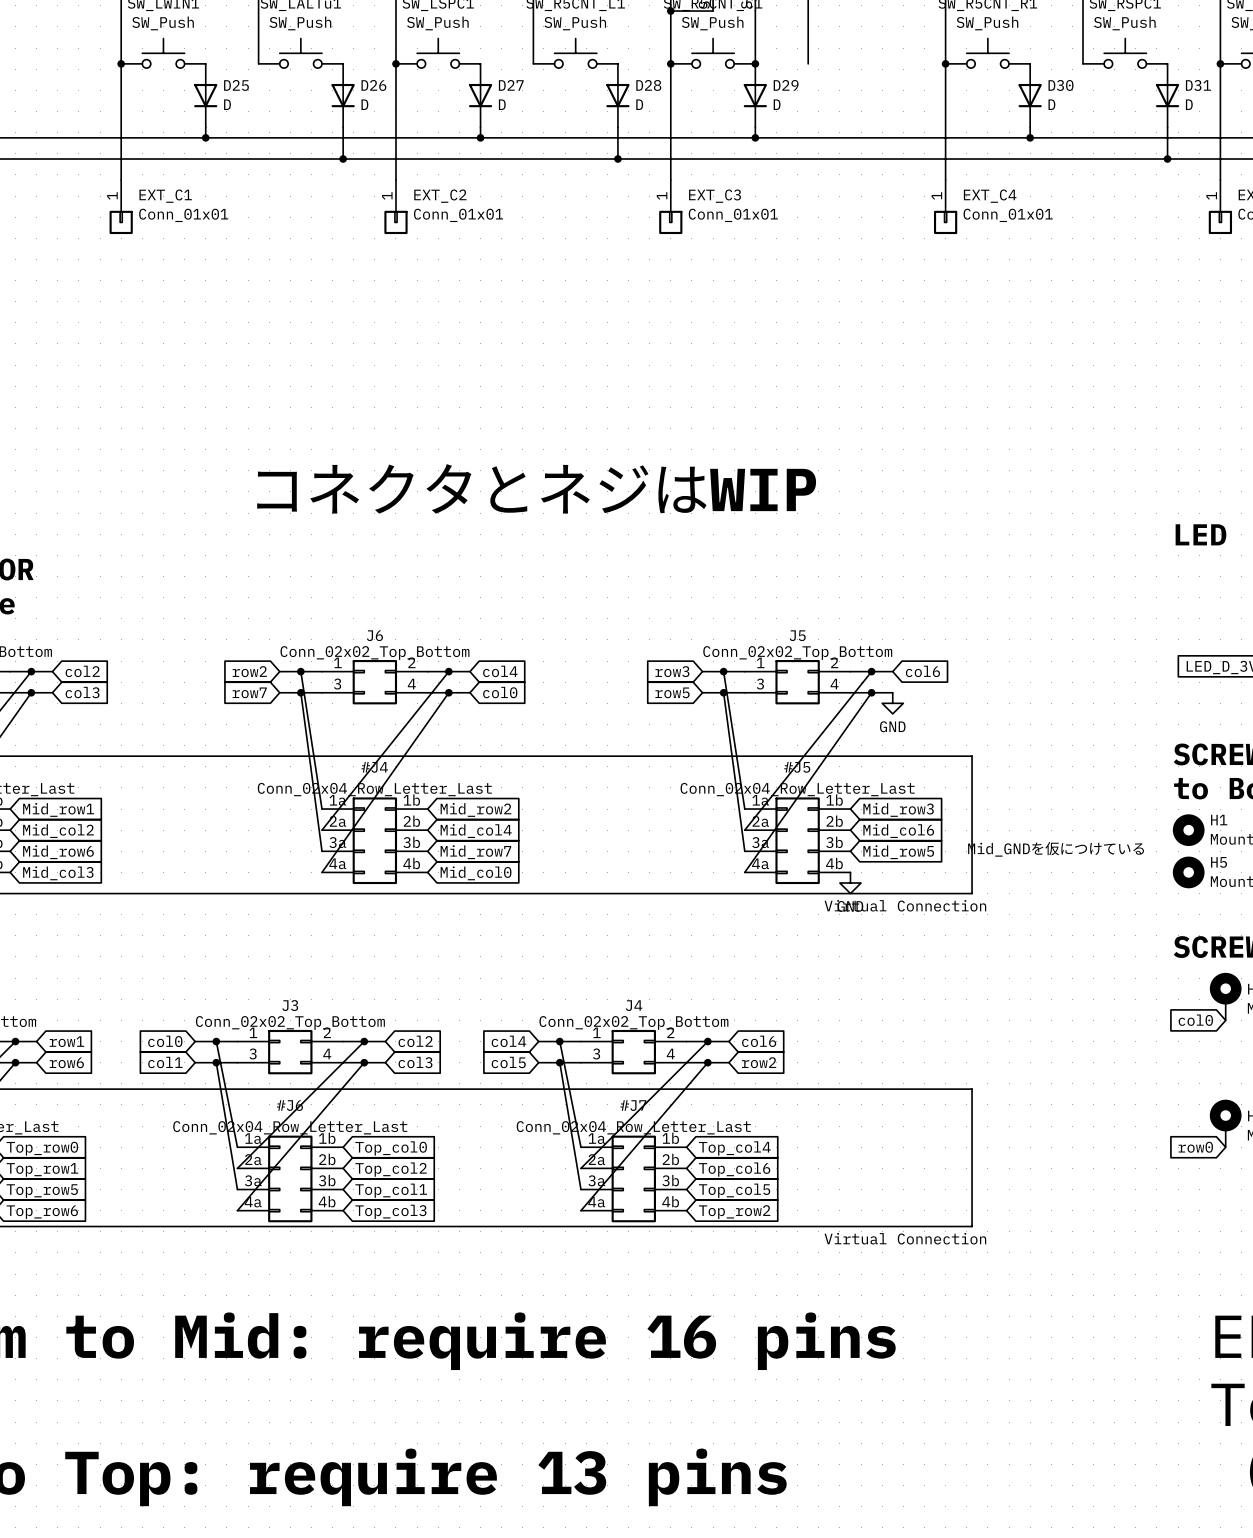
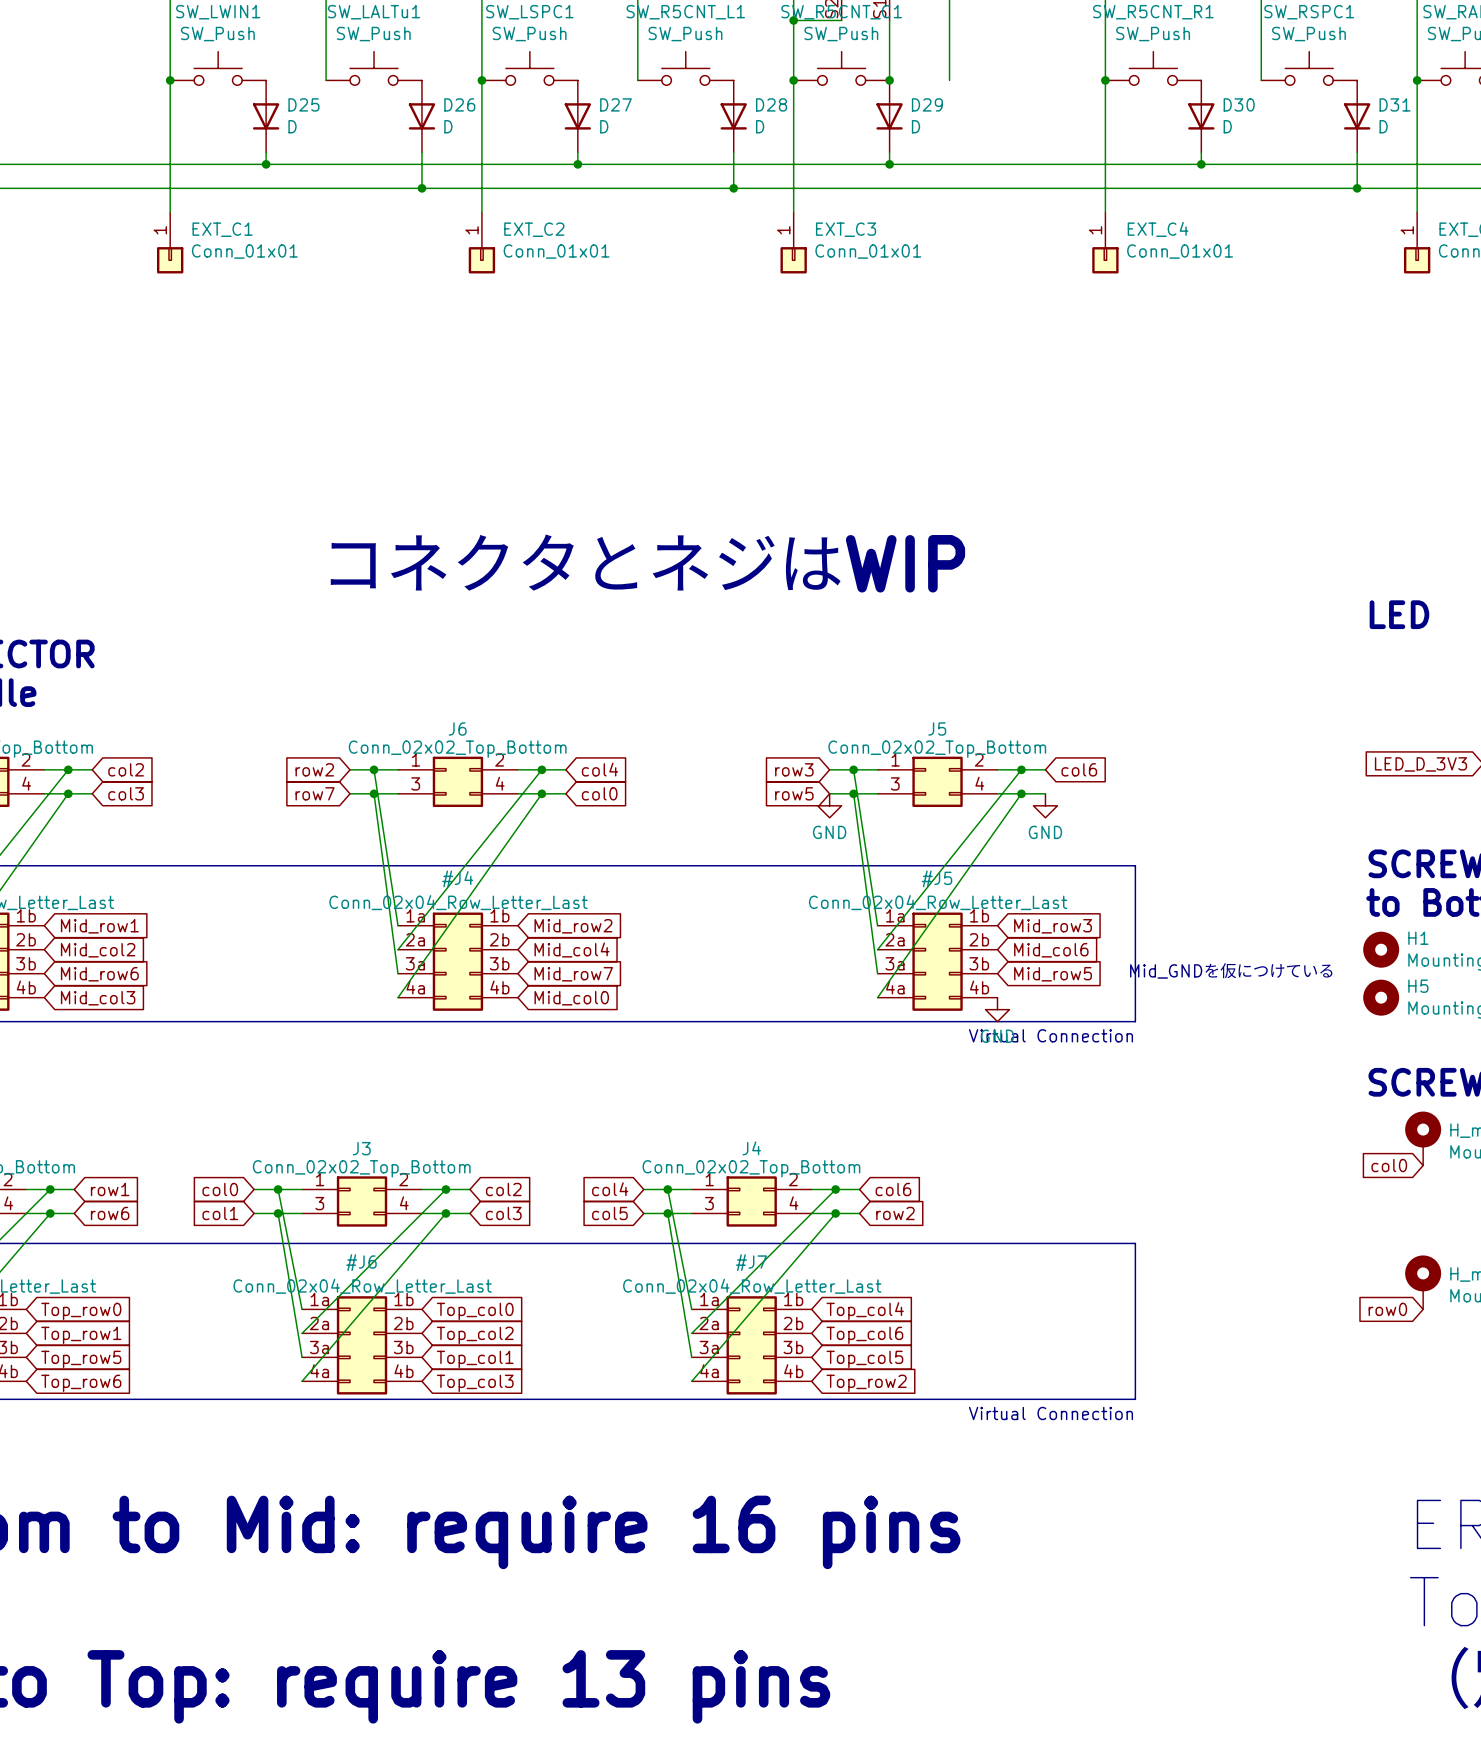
power symbol: none -> GND (829, 805)

